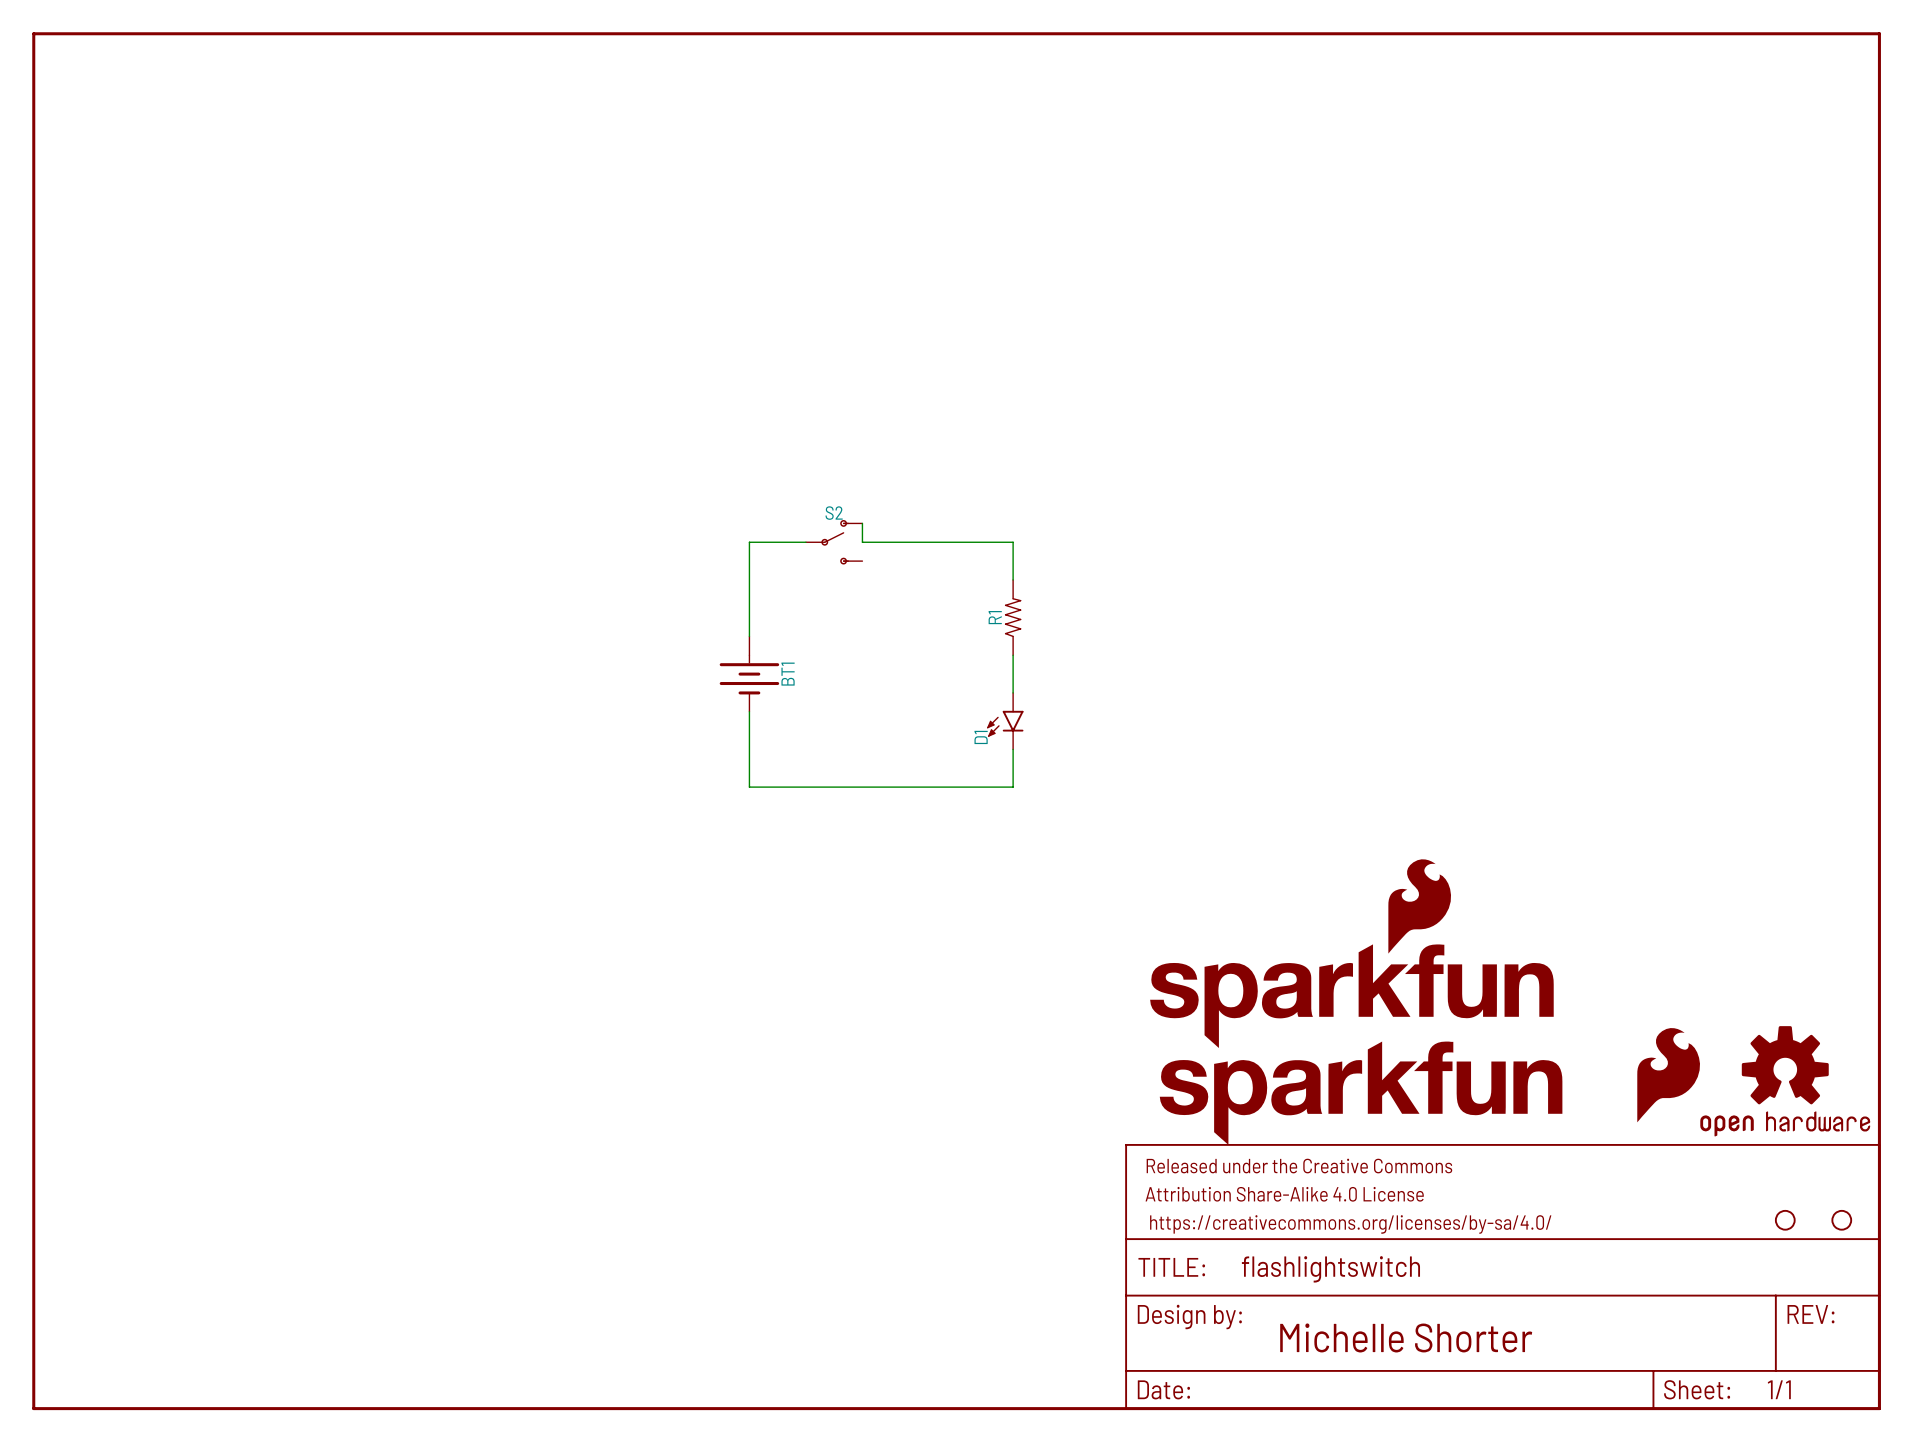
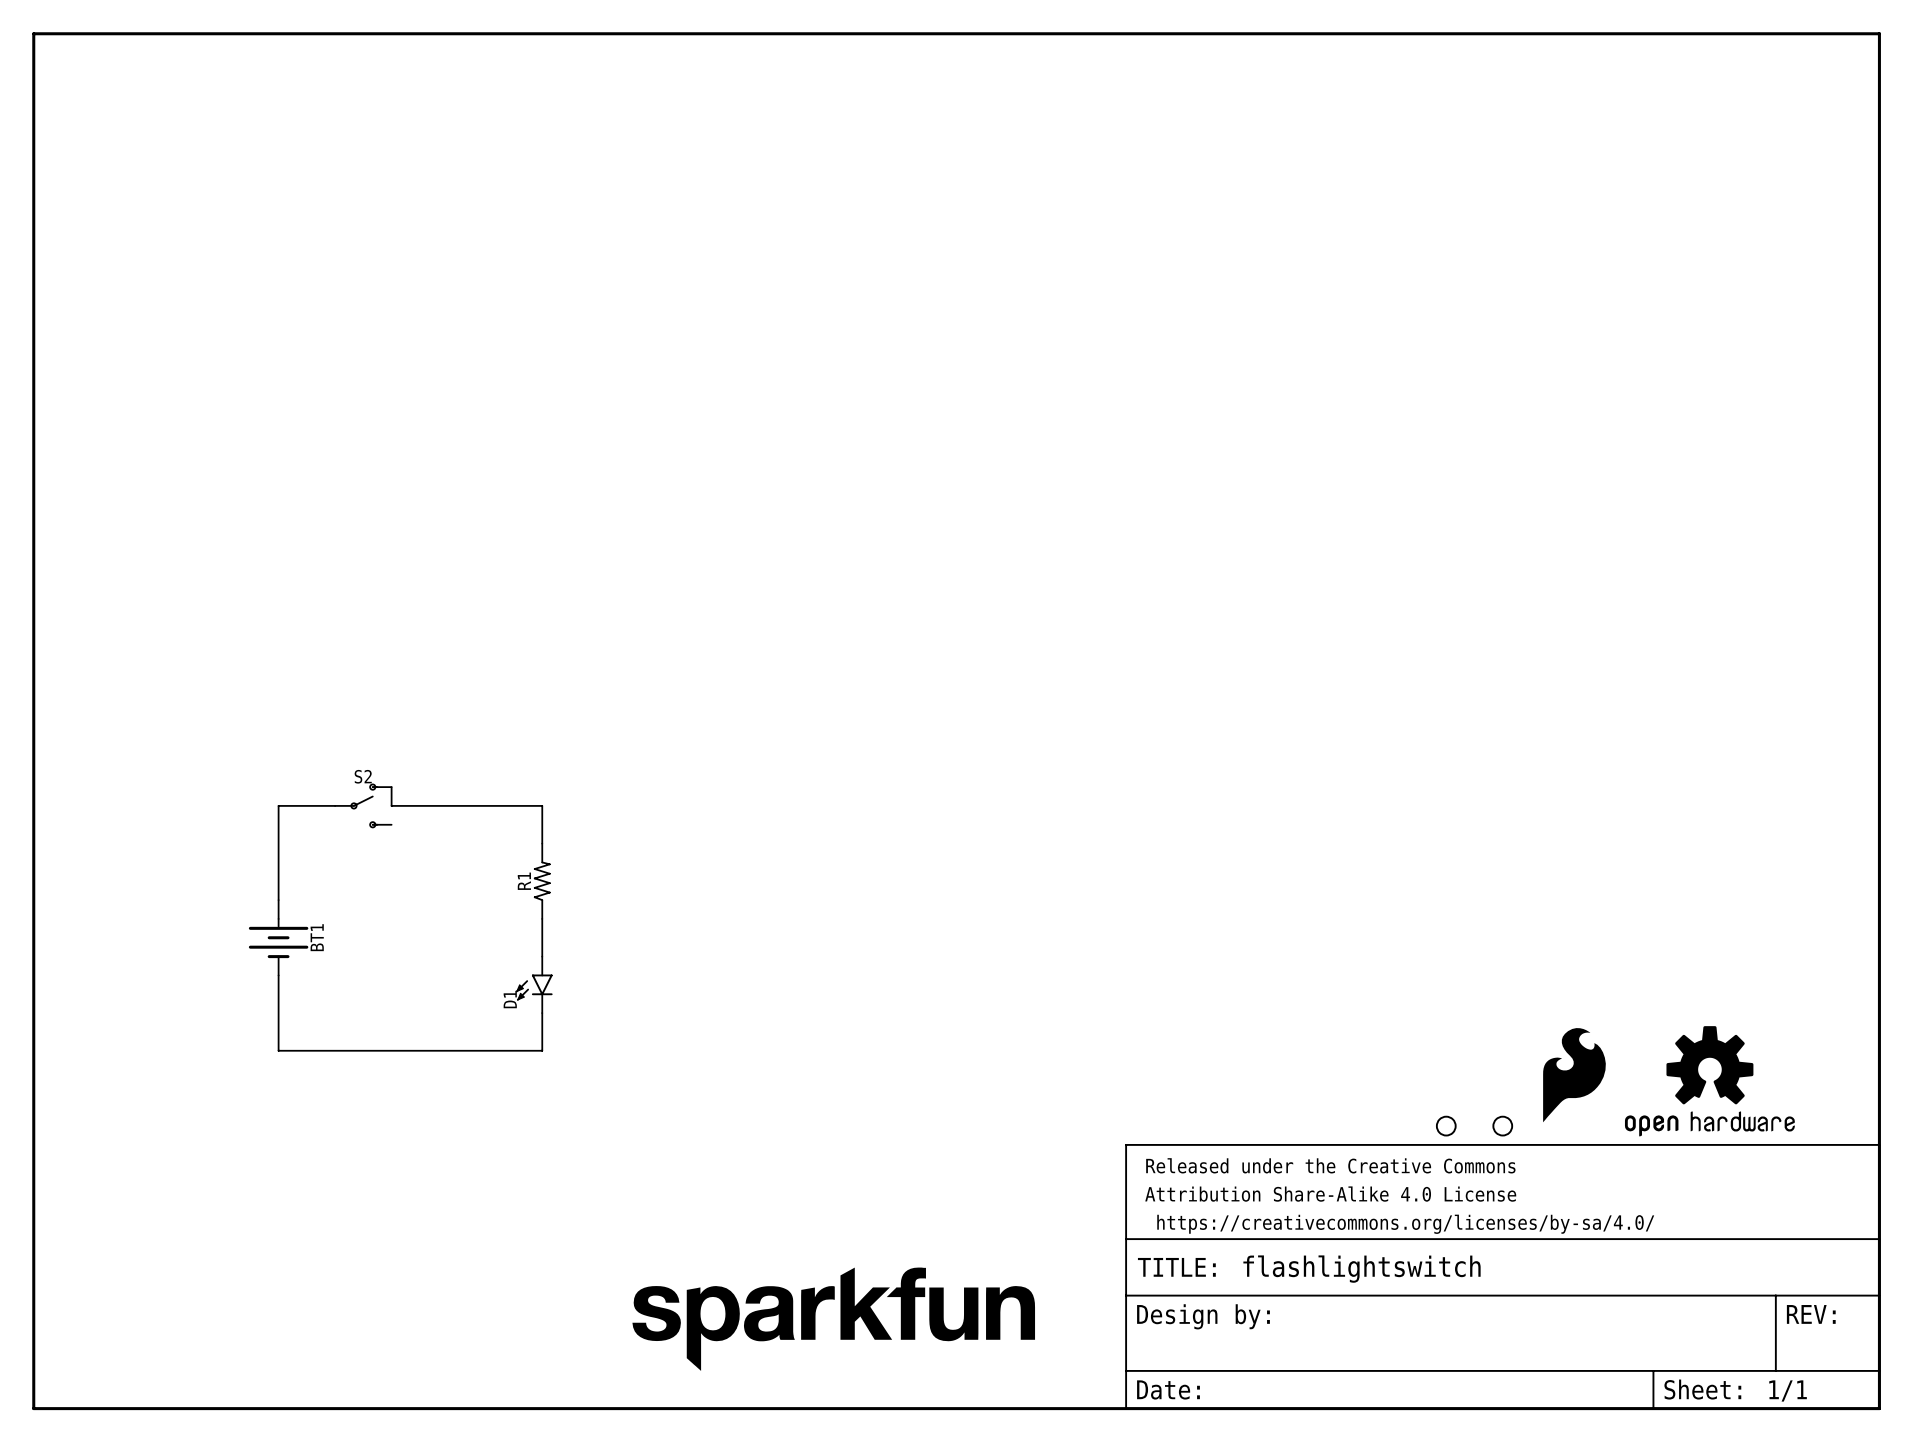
wire: (862, 523) (862, 542) (1013, 542) (1013, 579) -> none
wire: (805, 542) (749, 542) (749, 636) -> none
S2 position: (834, 542) -> (363, 805)
R1 position: (1013, 617) -> (542, 881)
wire: (1013, 655) (1013, 692) -> none
BT1 position: (749, 674) -> (278, 937)
wire: (749, 711) (749, 787) (1013, 787) (1013, 749) -> none
D1 position: (1005, 721) -> (534, 984)
wire: none -> (391, 787) (391, 805) (542, 805) (542, 843)
wire: none -> (335, 805) (278, 805) (278, 900)
wire: none -> (542, 918) (542, 956)
part: (1351, 953) -> none
wire: none -> (278, 975) (278, 1050) (542, 1050) (542, 1013)
part position: (1668, 1075) -> (1574, 1075)
part position: (1785, 1081) -> (1709, 1081)
part: (1361, 1093) -> none
part: none -> (1446, 1126)
part: none -> (1502, 1126)
part: (1785, 1220) -> none
part: (1841, 1220) -> none
part: none -> (833, 1319)
text: Michelle Shorter (1406, 1337) -> none

